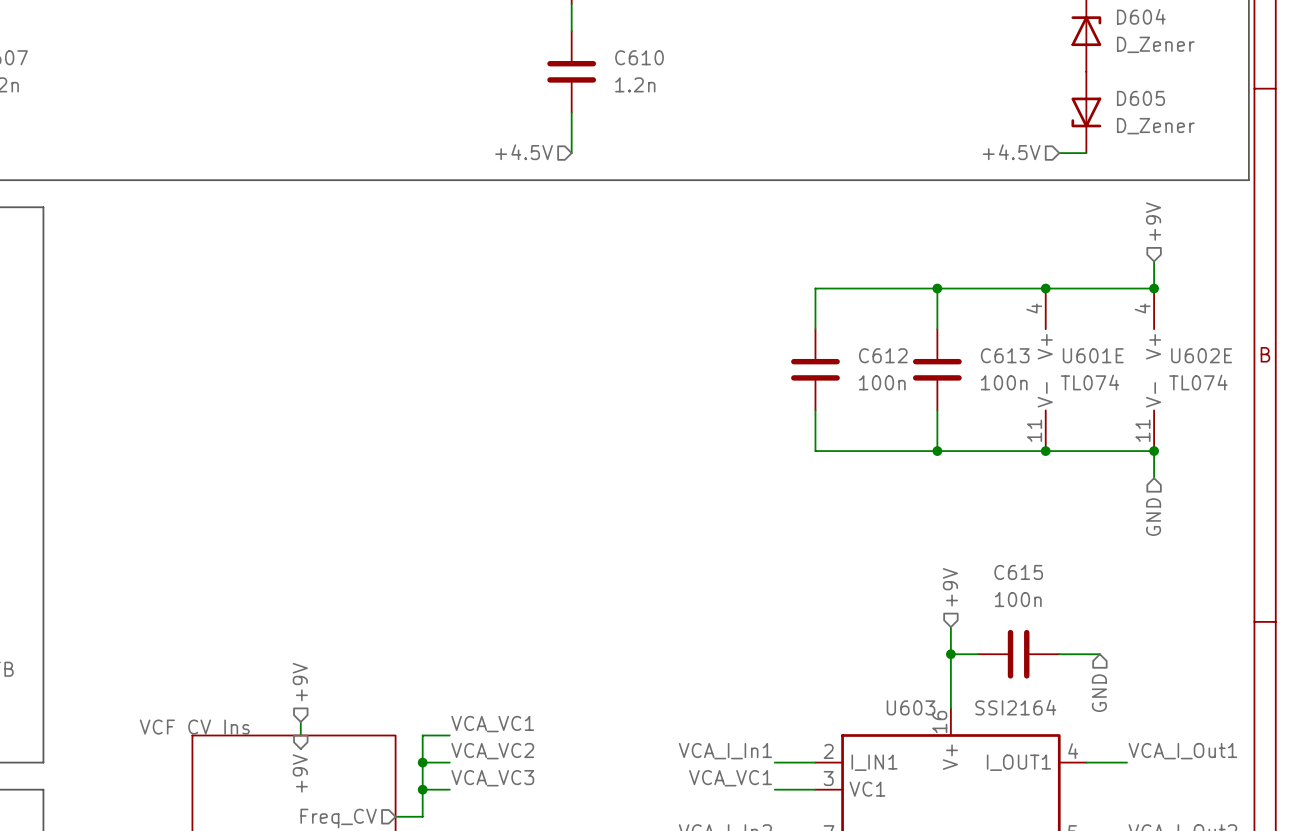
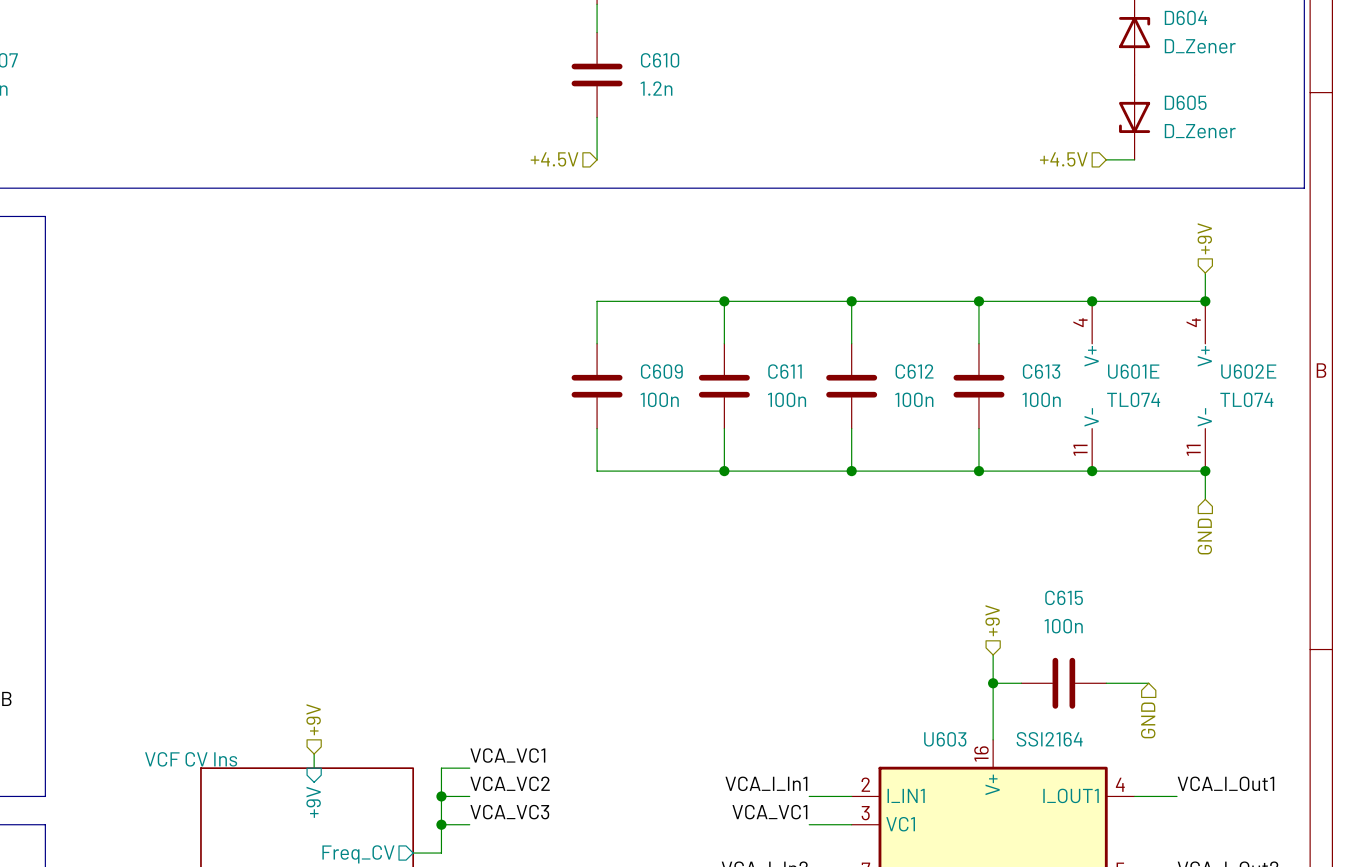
wire: none -> (724, 301) (724, 343)
junction: none -> (724, 301)
wire: none -> (851, 301) (597, 301) (597, 343)
junction: none -> (851, 301)
C609: none -> 100n (597, 386)
C611: none -> 100n (724, 386)
wire: none -> (597, 428) (597, 471) (851, 471)
wire: none -> (724, 428) (724, 471)
junction: none -> (724, 471)
junction: none -> (851, 471)

